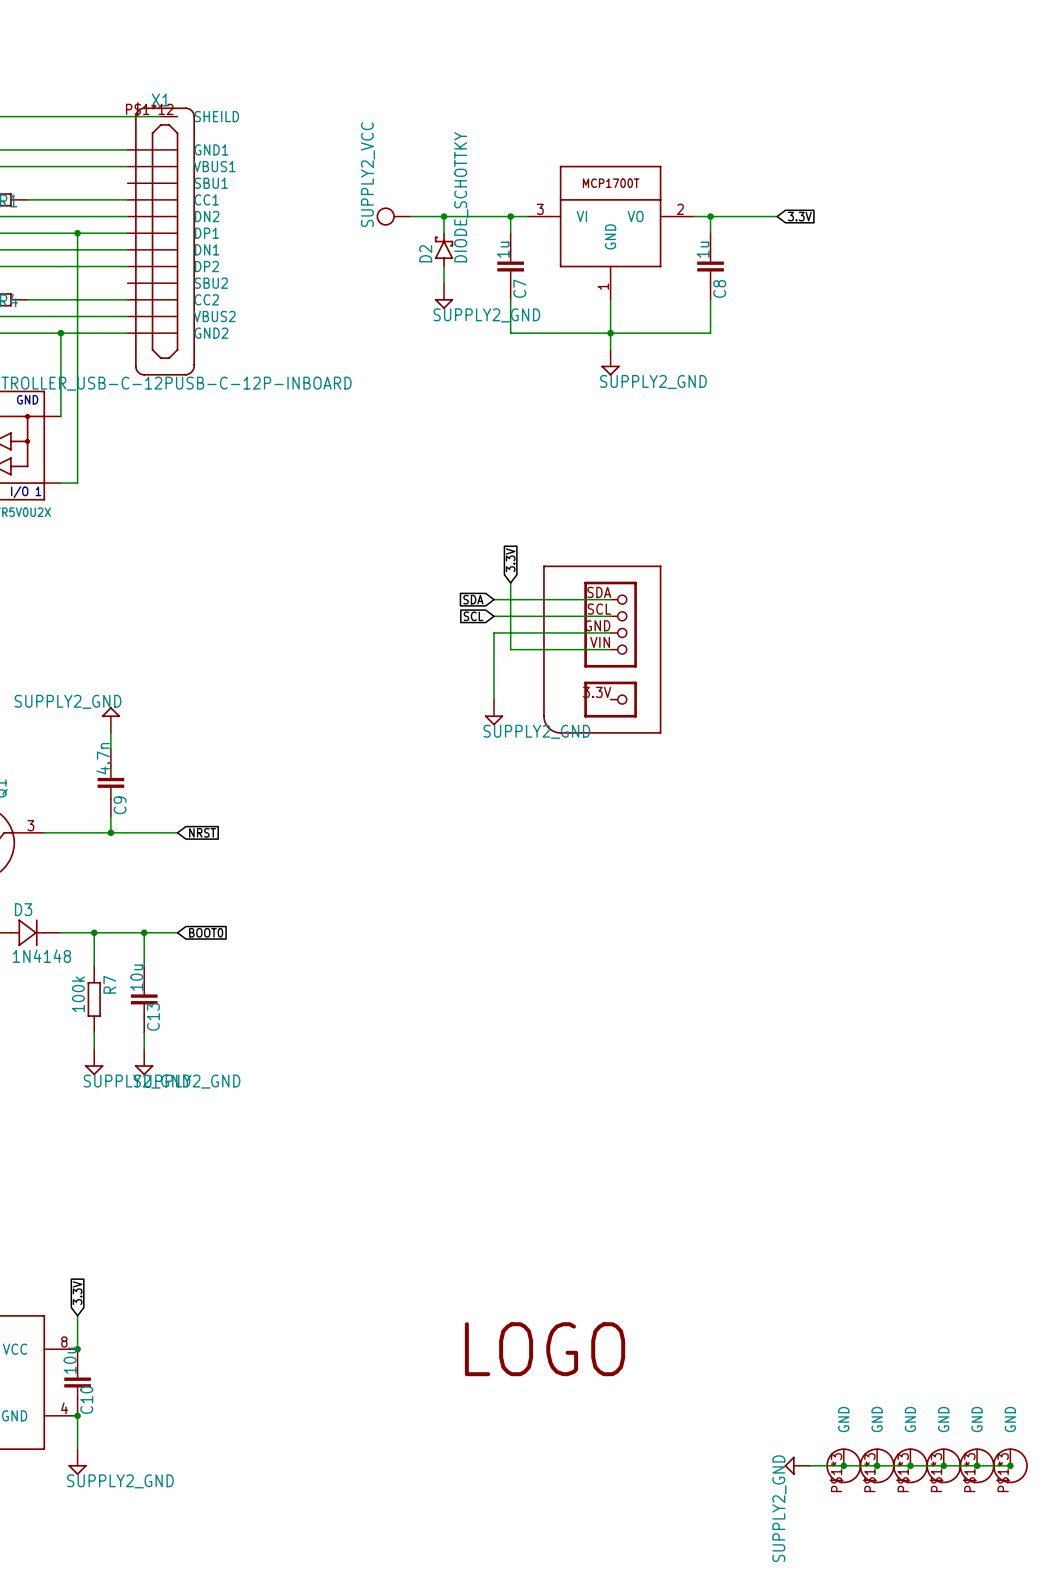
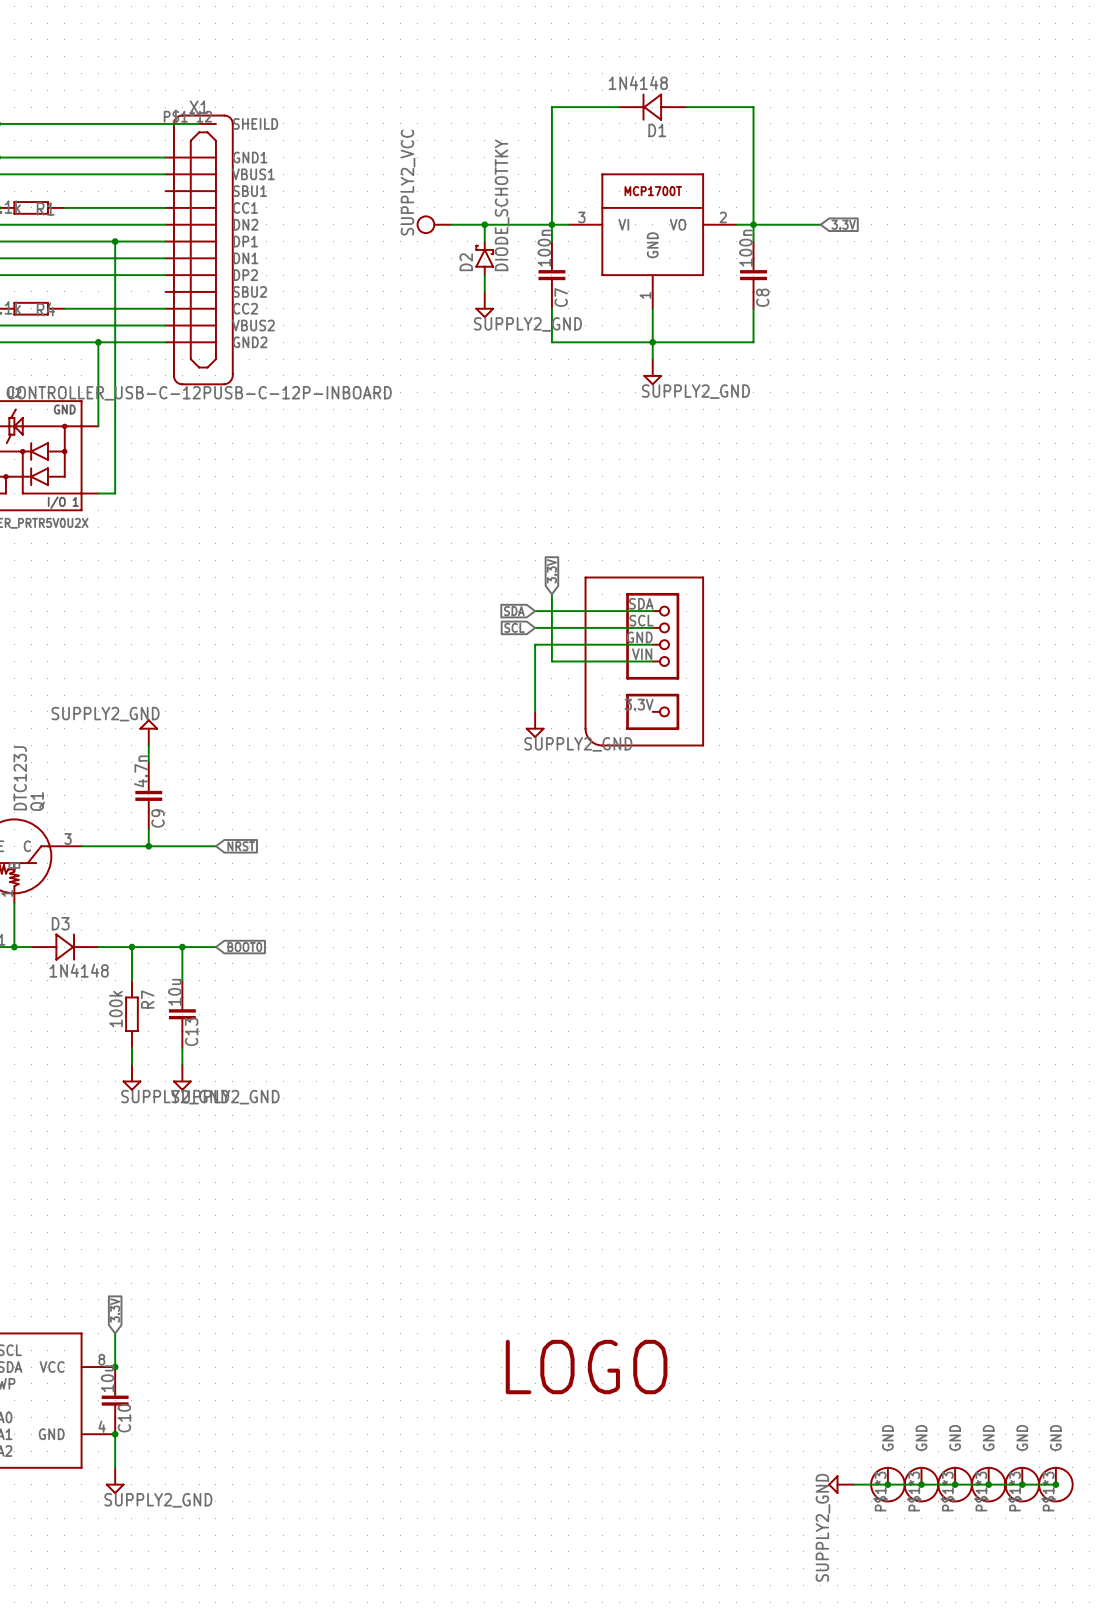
wire: none -> (619, 107) (551, 107) (551, 224)
D1: none -> 1N4148 (652, 107)
wire: none -> (686, 107) (753, 107) (753, 224)
C7 value: 1u (503, 249) -> 100n (544, 248)
C8 value: 1u (703, 249) -> 100n (745, 248)

